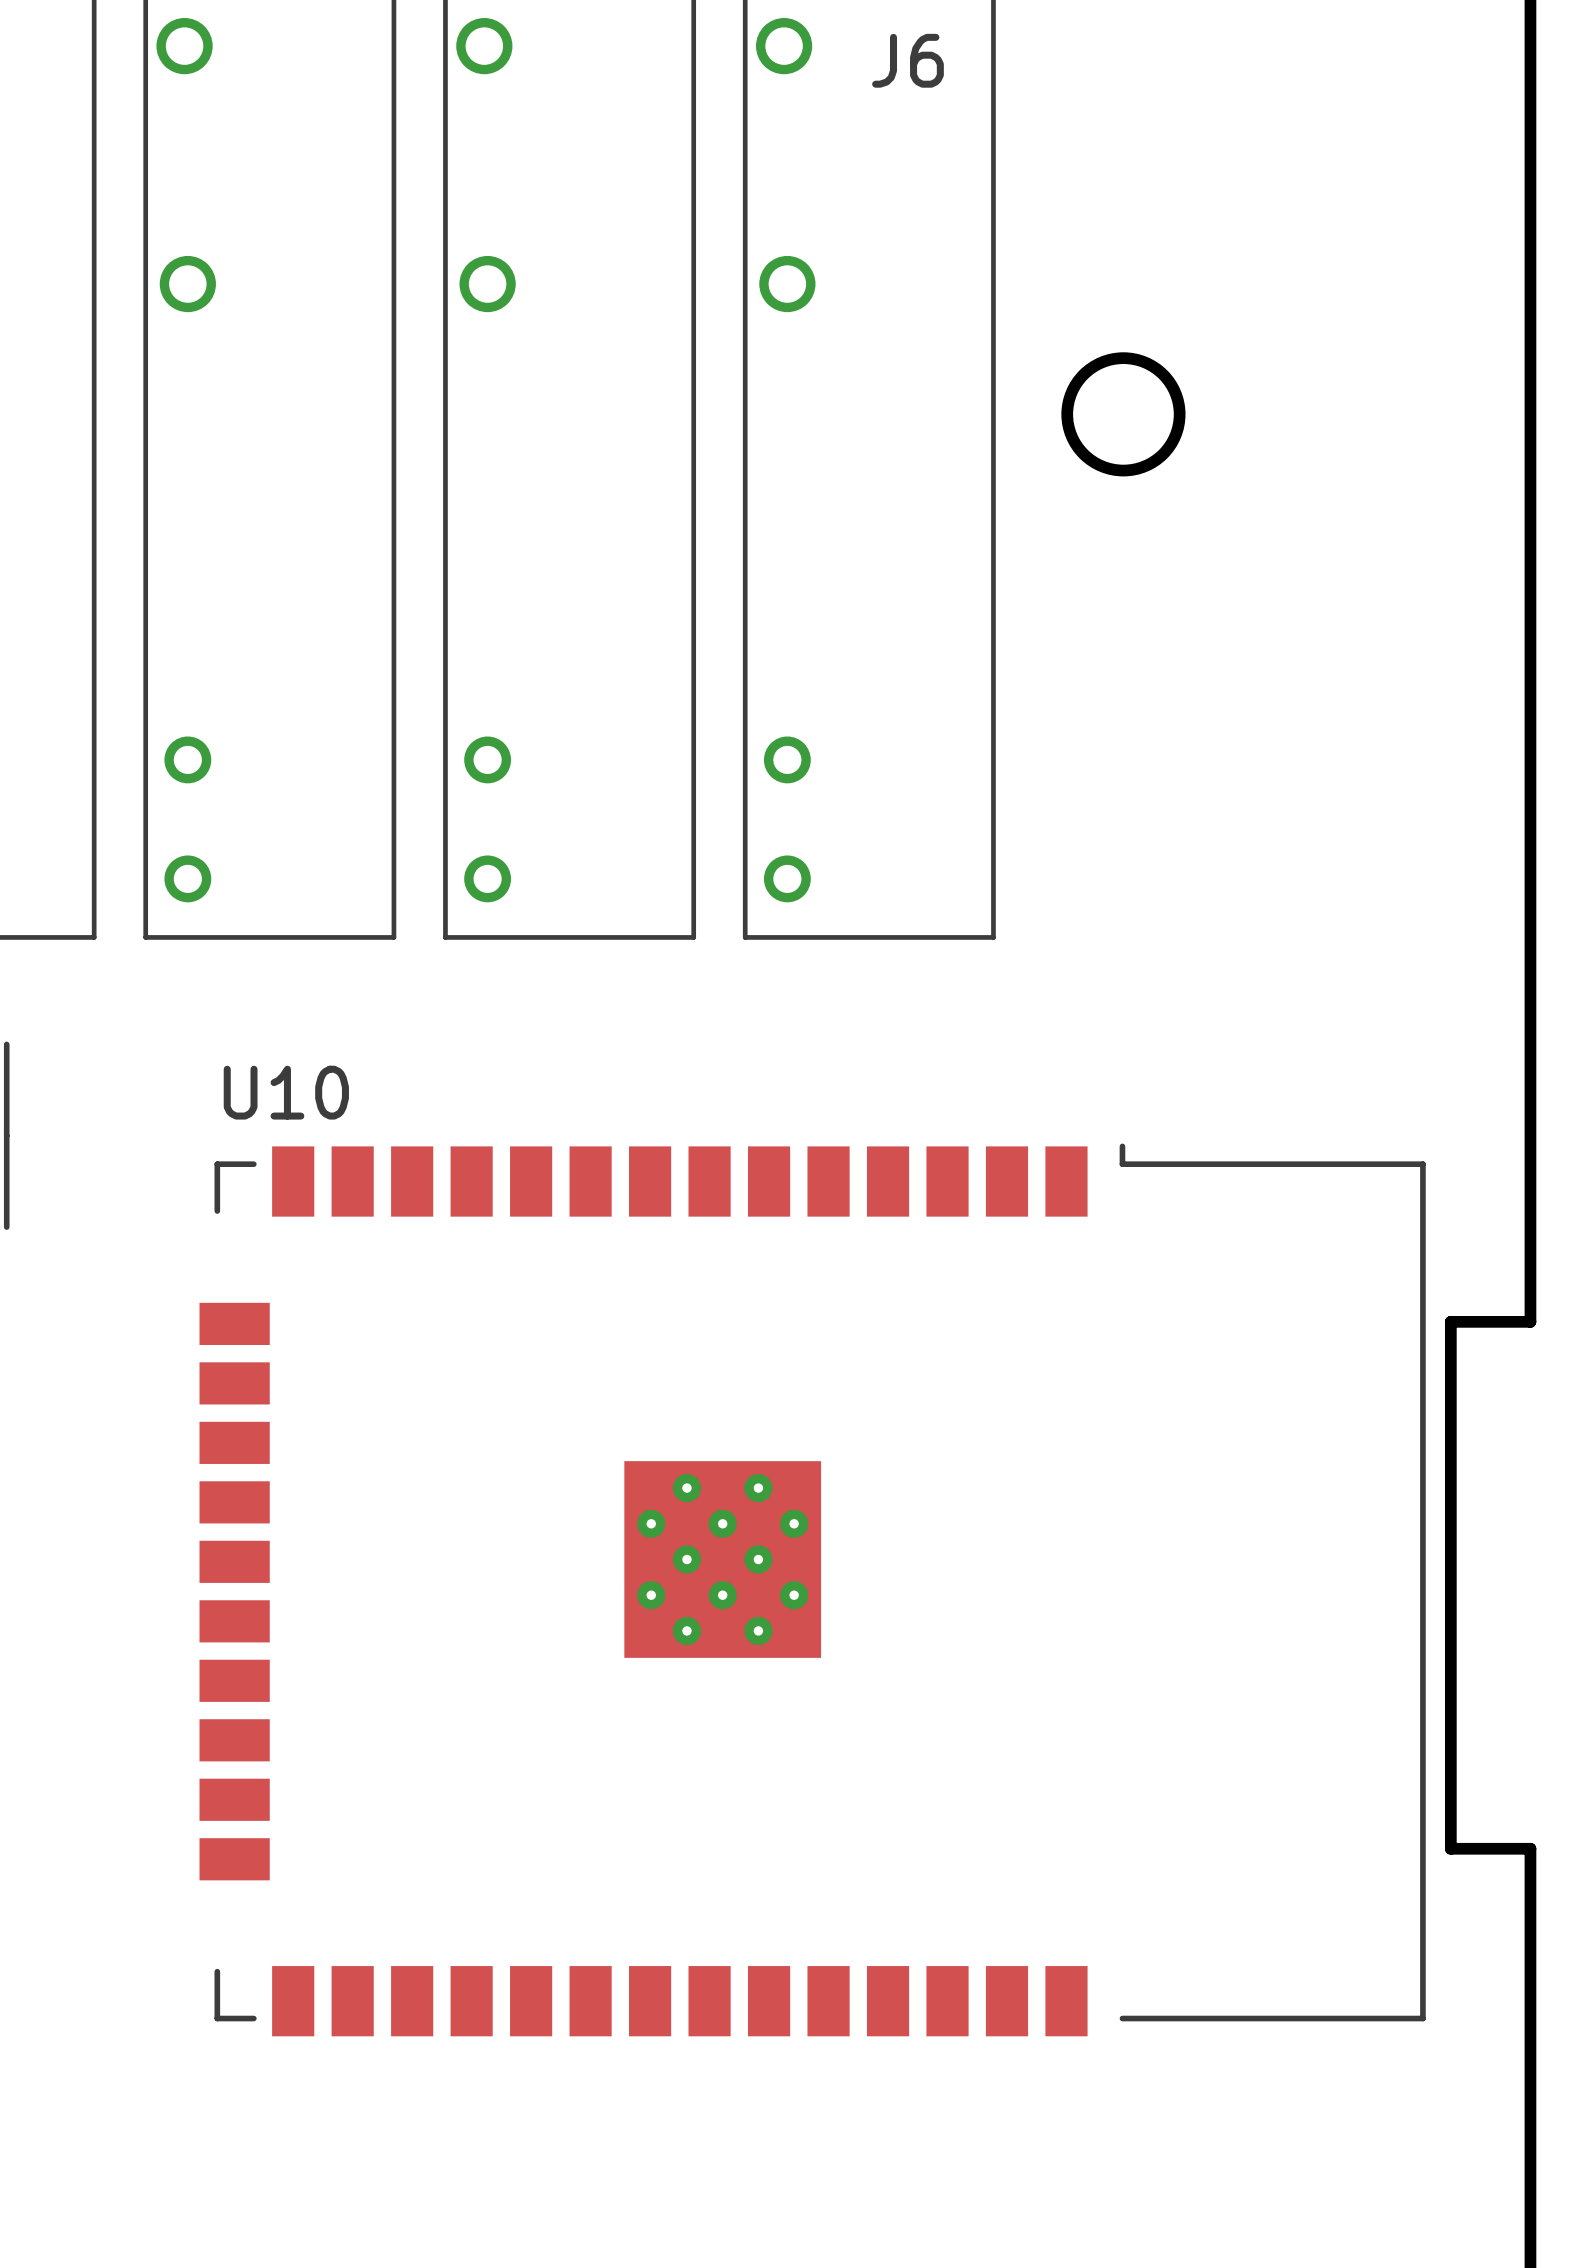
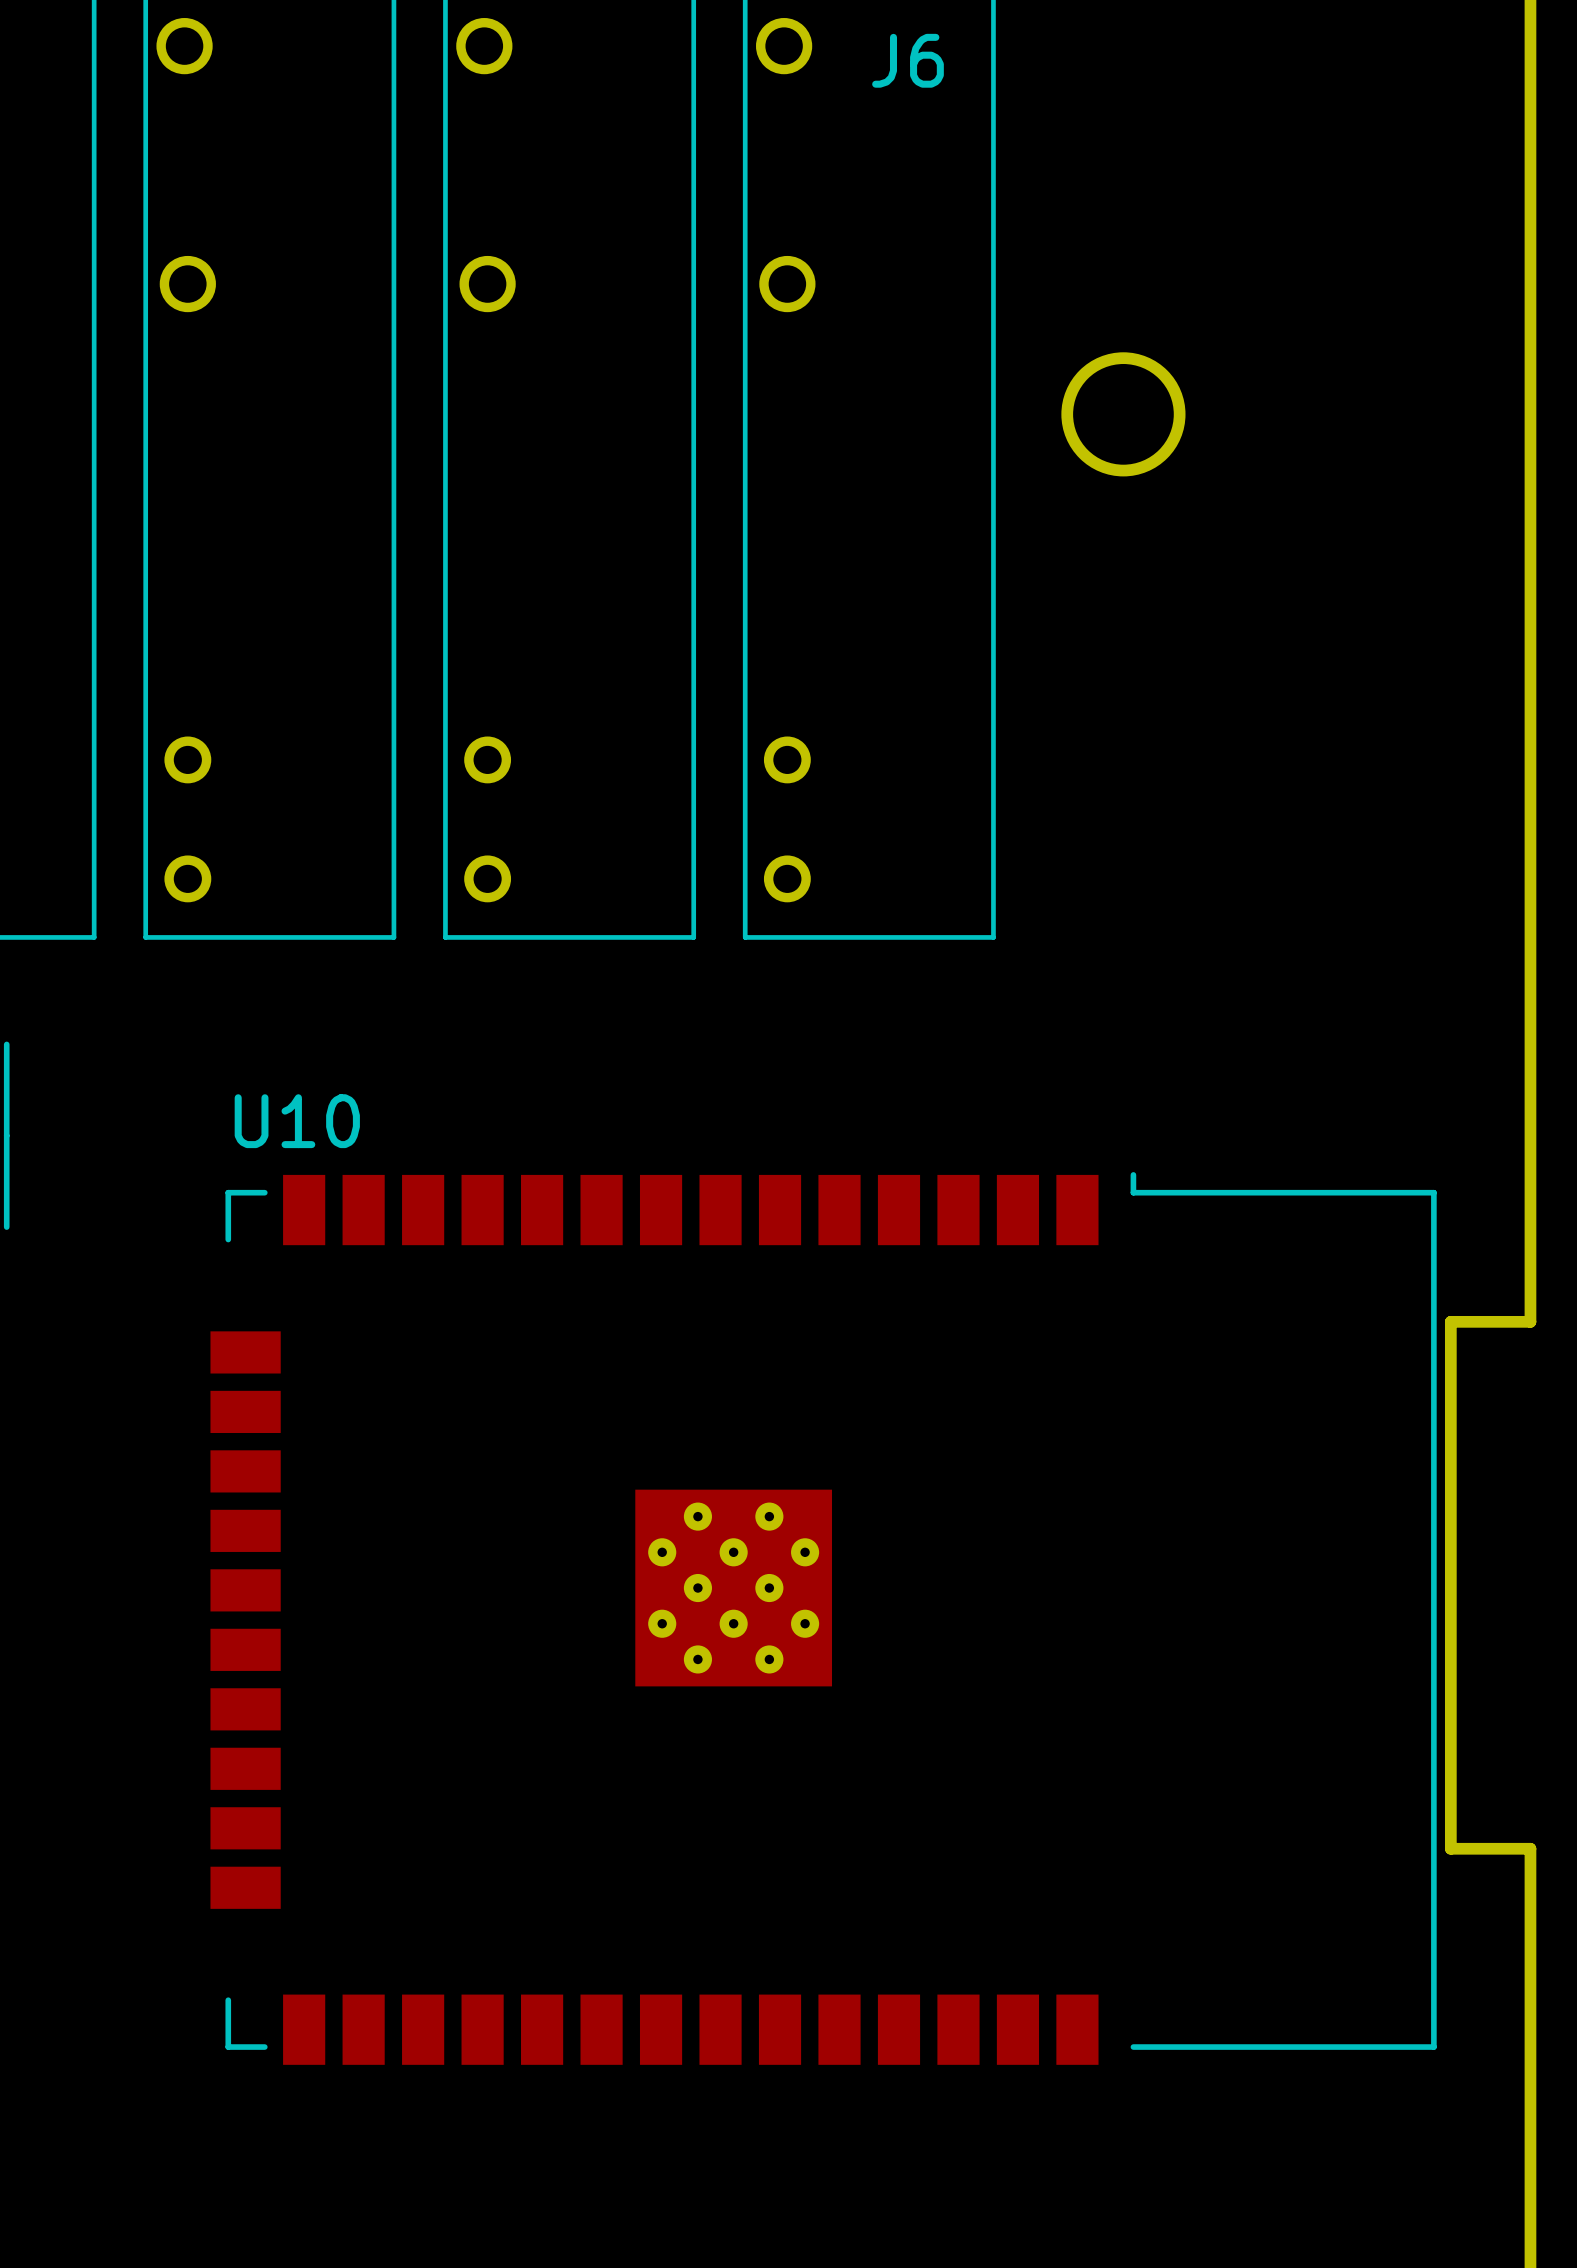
U10 position: (812, 1589) -> (823, 1618)

